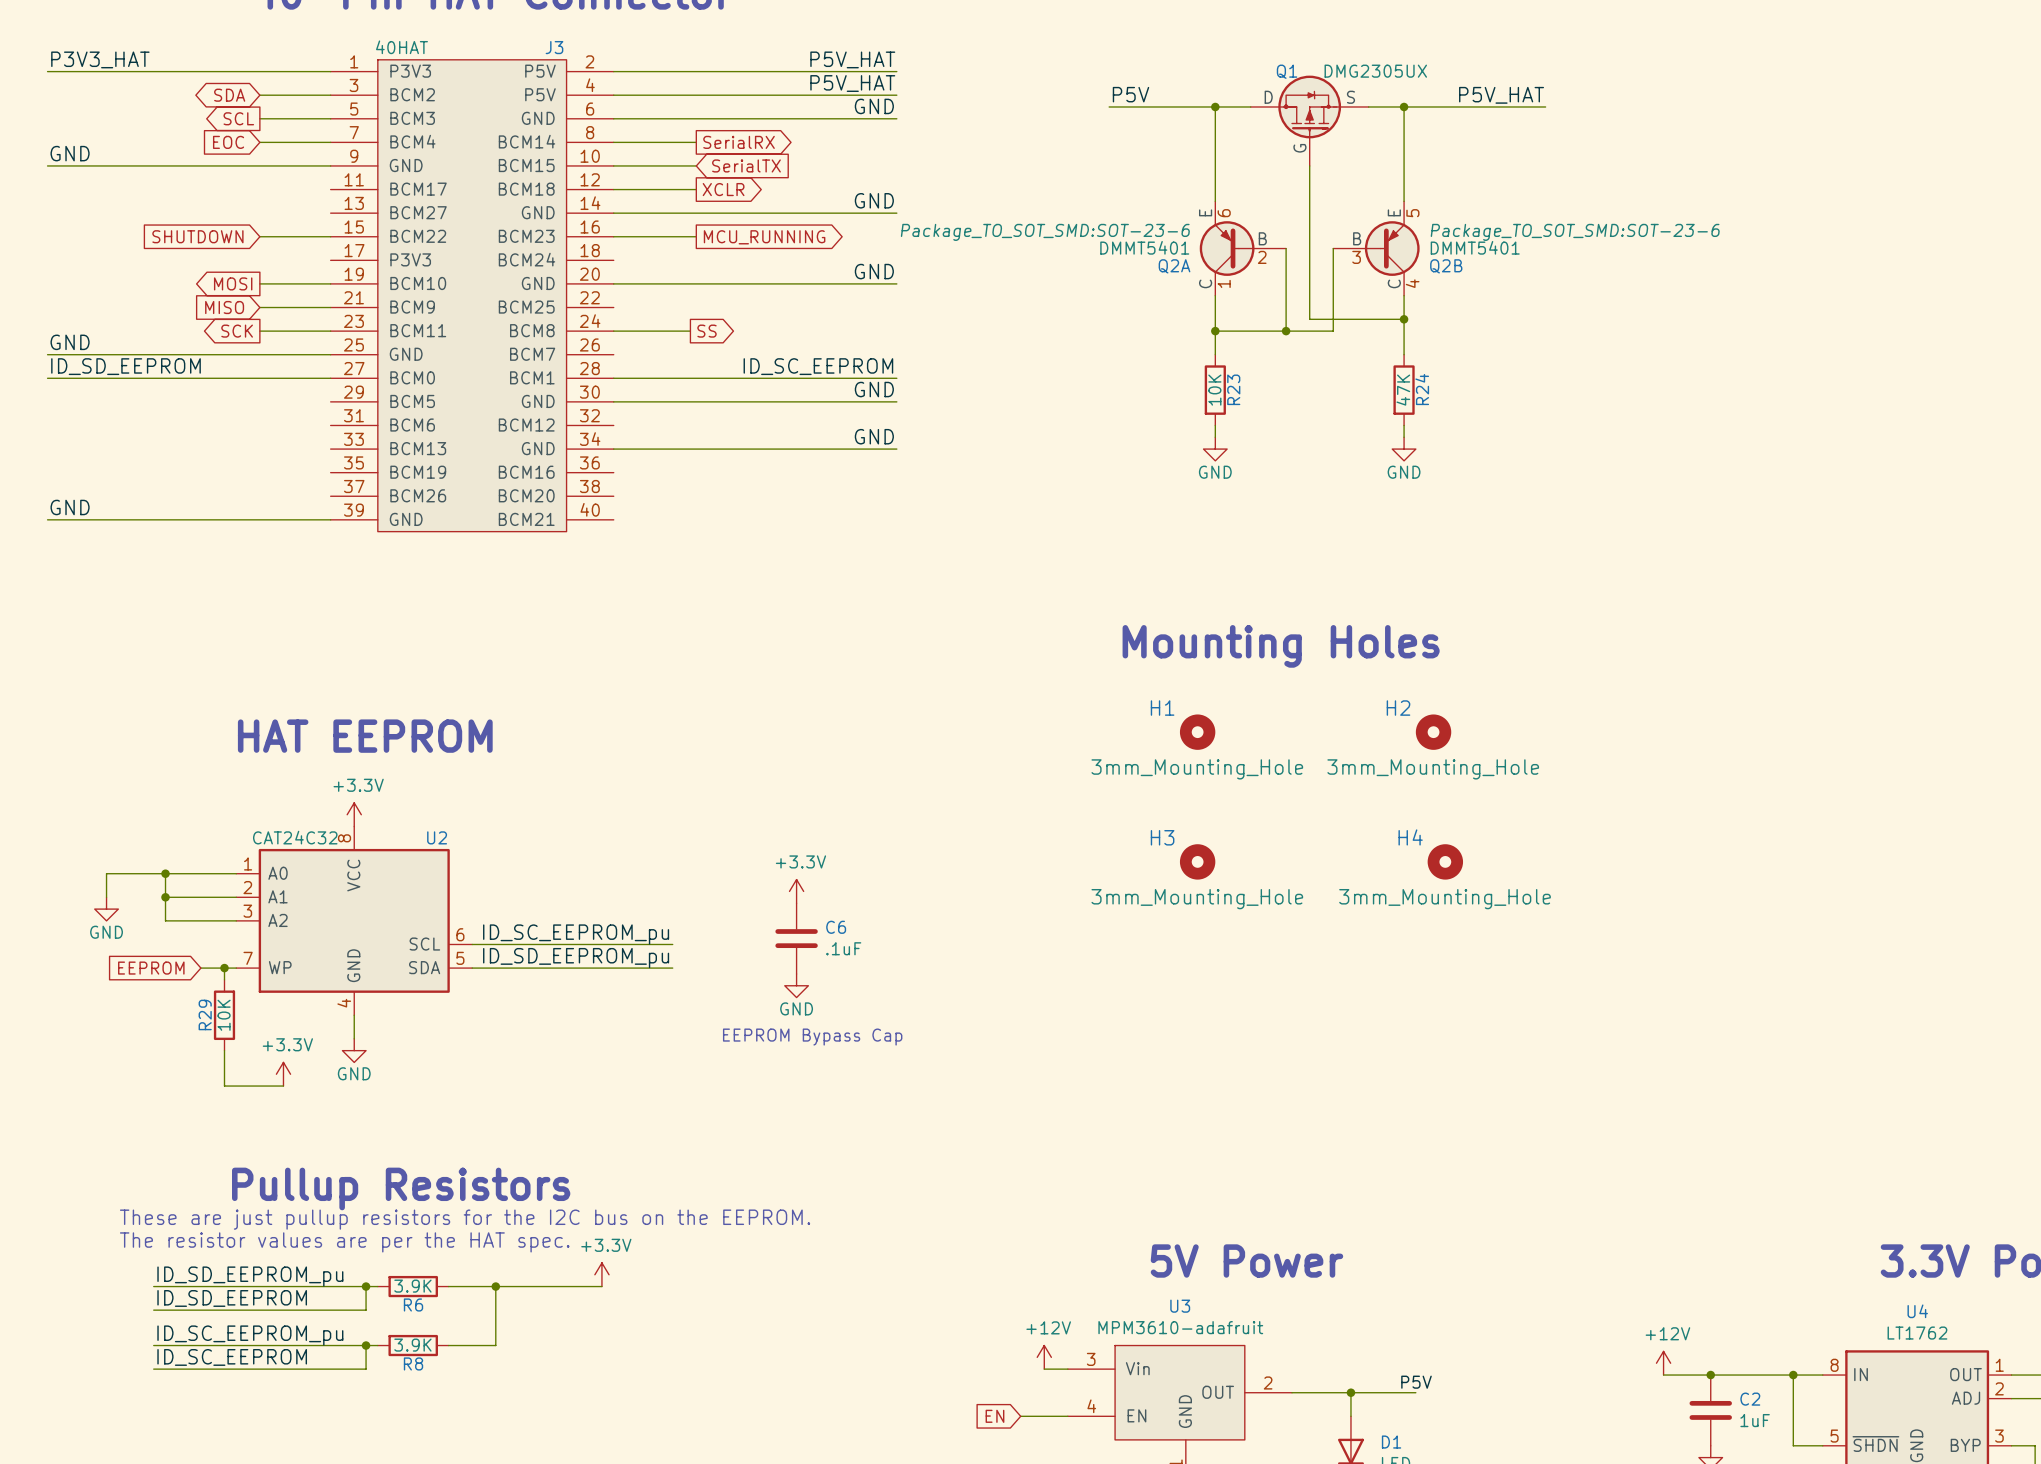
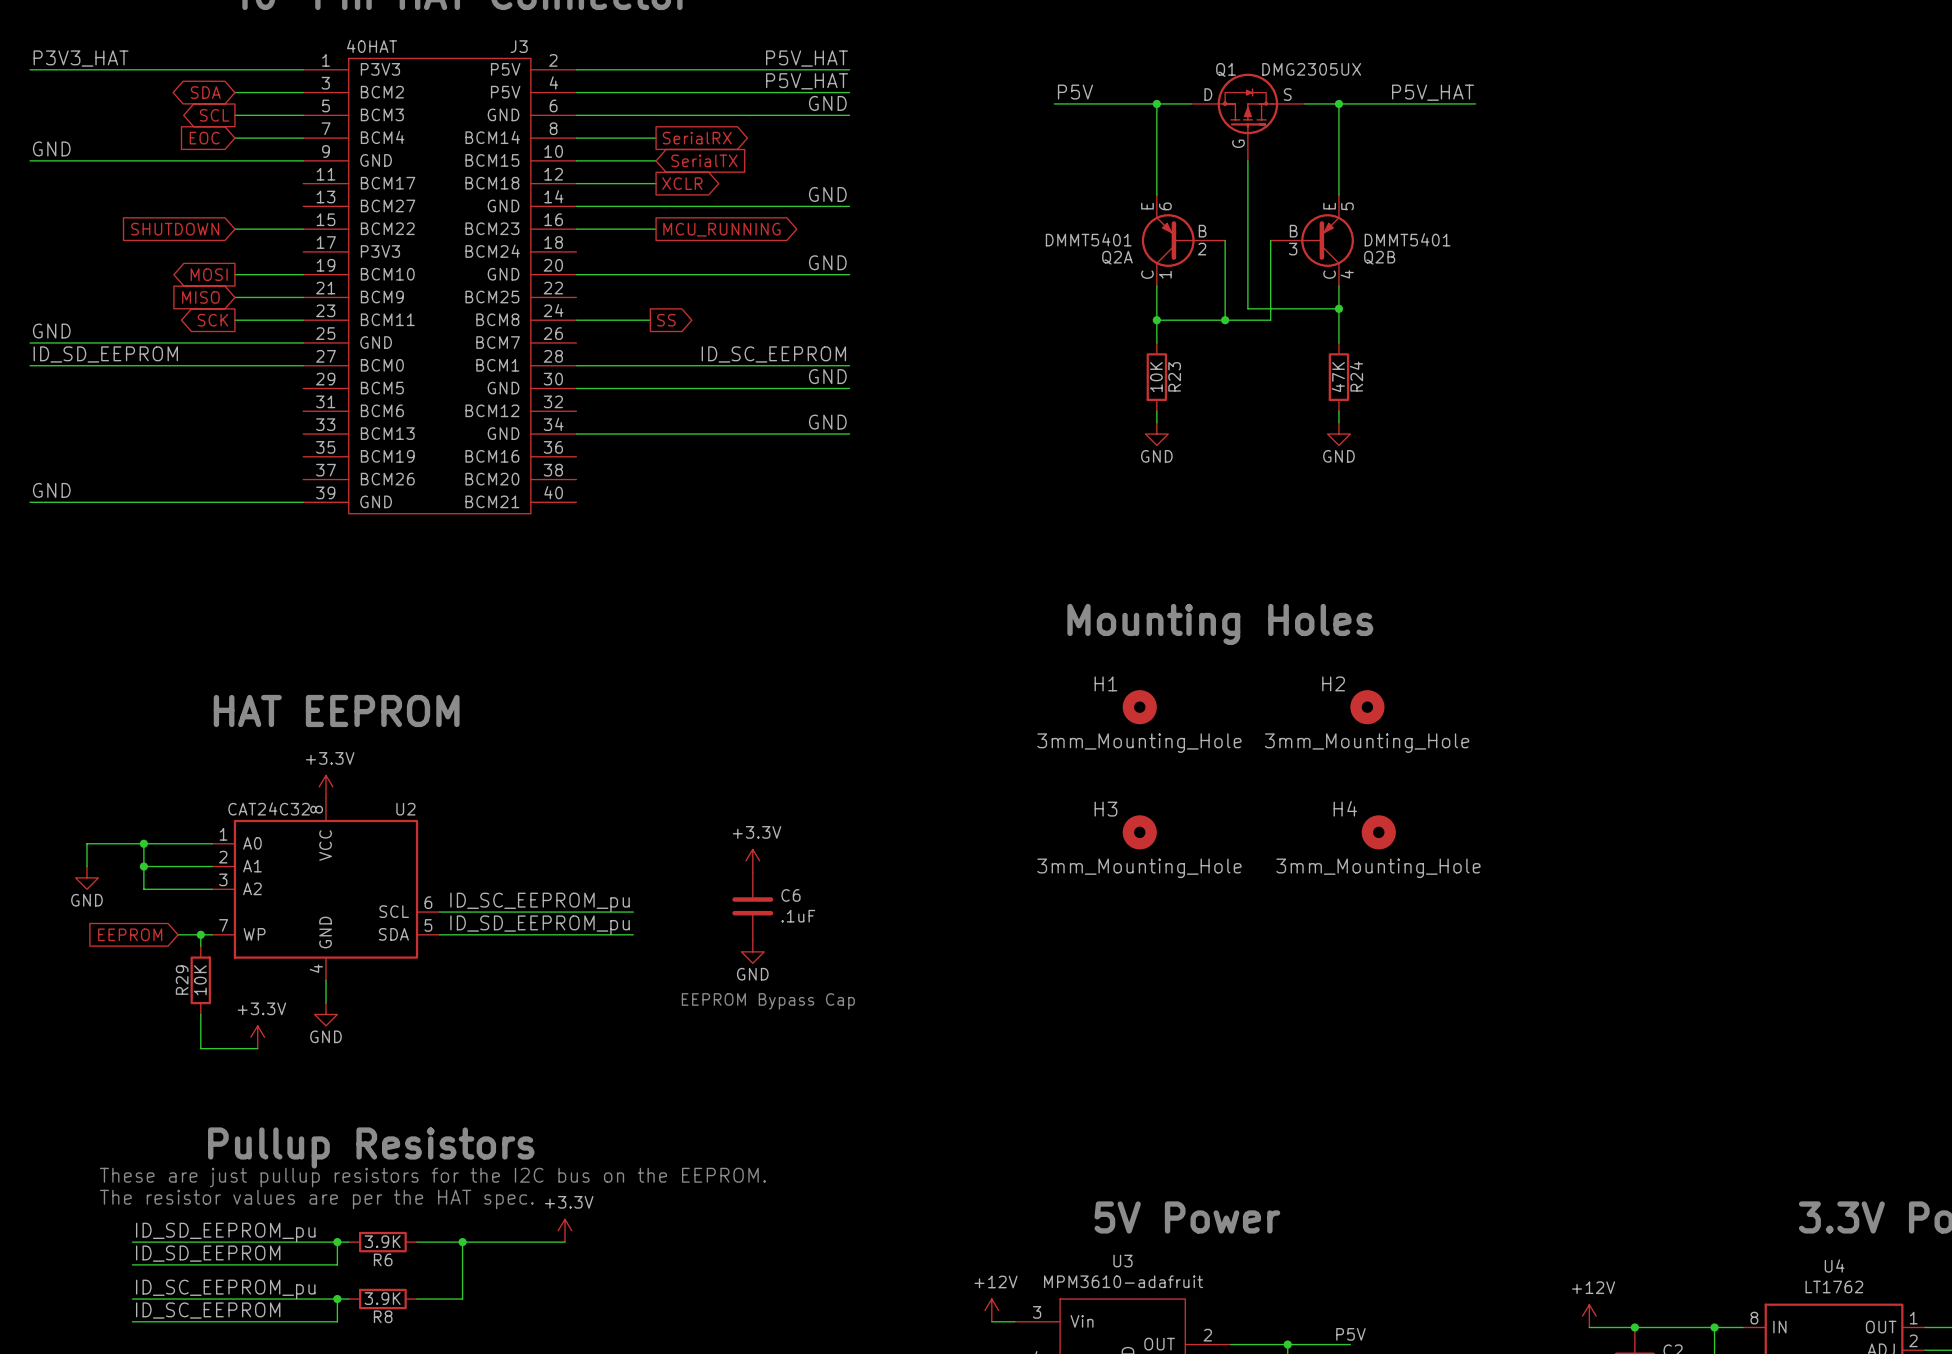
Q2A text: Package_TO_SOT_SMD:SOT-23-6 (1045, 232) -> none
Q2B text: Package_TO_SOT_SMD:SOT-23-6 (1575, 232) -> none

